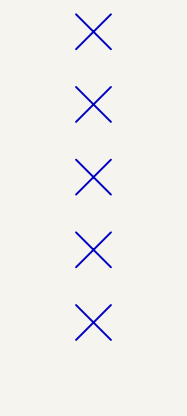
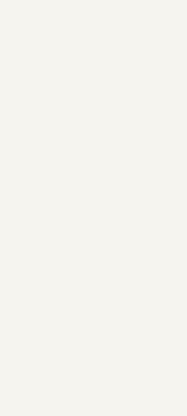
no-connect mark: (93, 31) -> none
no-connect mark: (93, 104) -> none
no-connect mark: (93, 177) -> none
no-connect mark: (93, 249) -> none
no-connect mark: (93, 322) -> none

